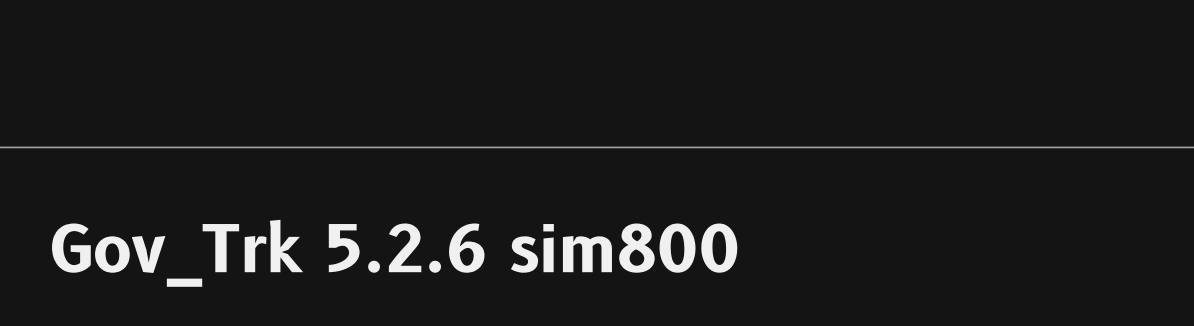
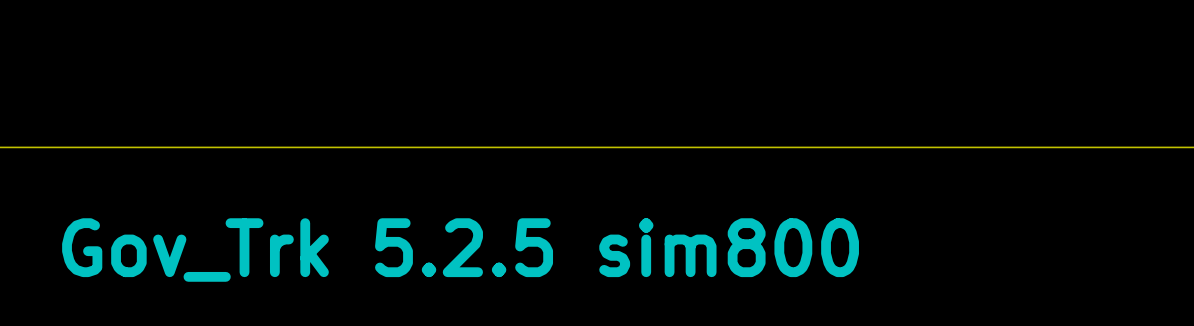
text: Gov_Trk 5.2.6 sim800 (394, 253) -> Gov_Trk 5.2.5 sim800 (460, 250)

